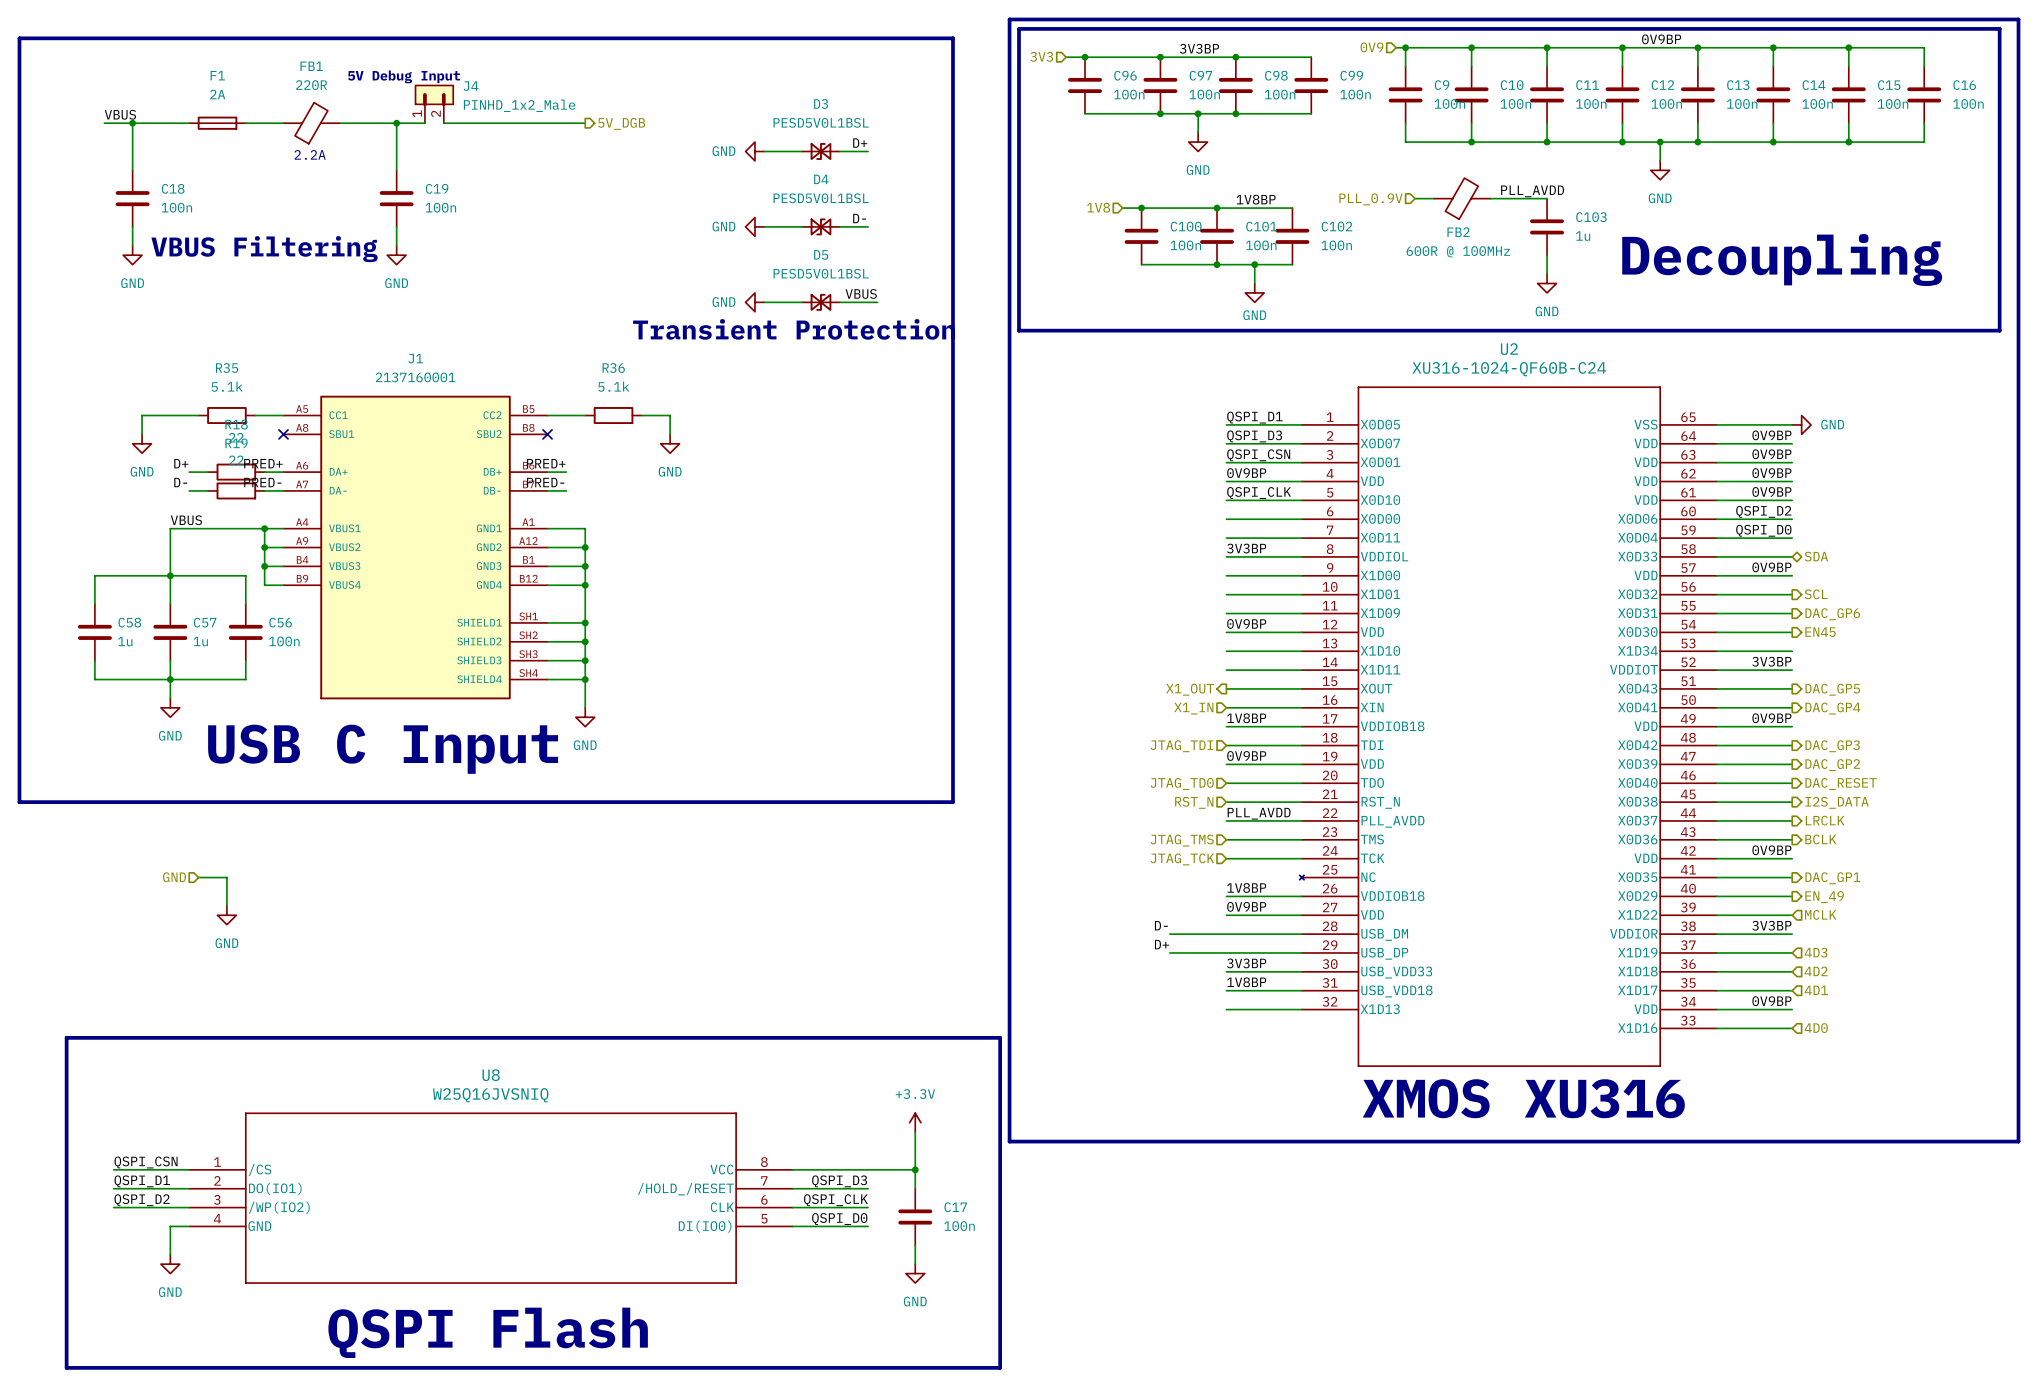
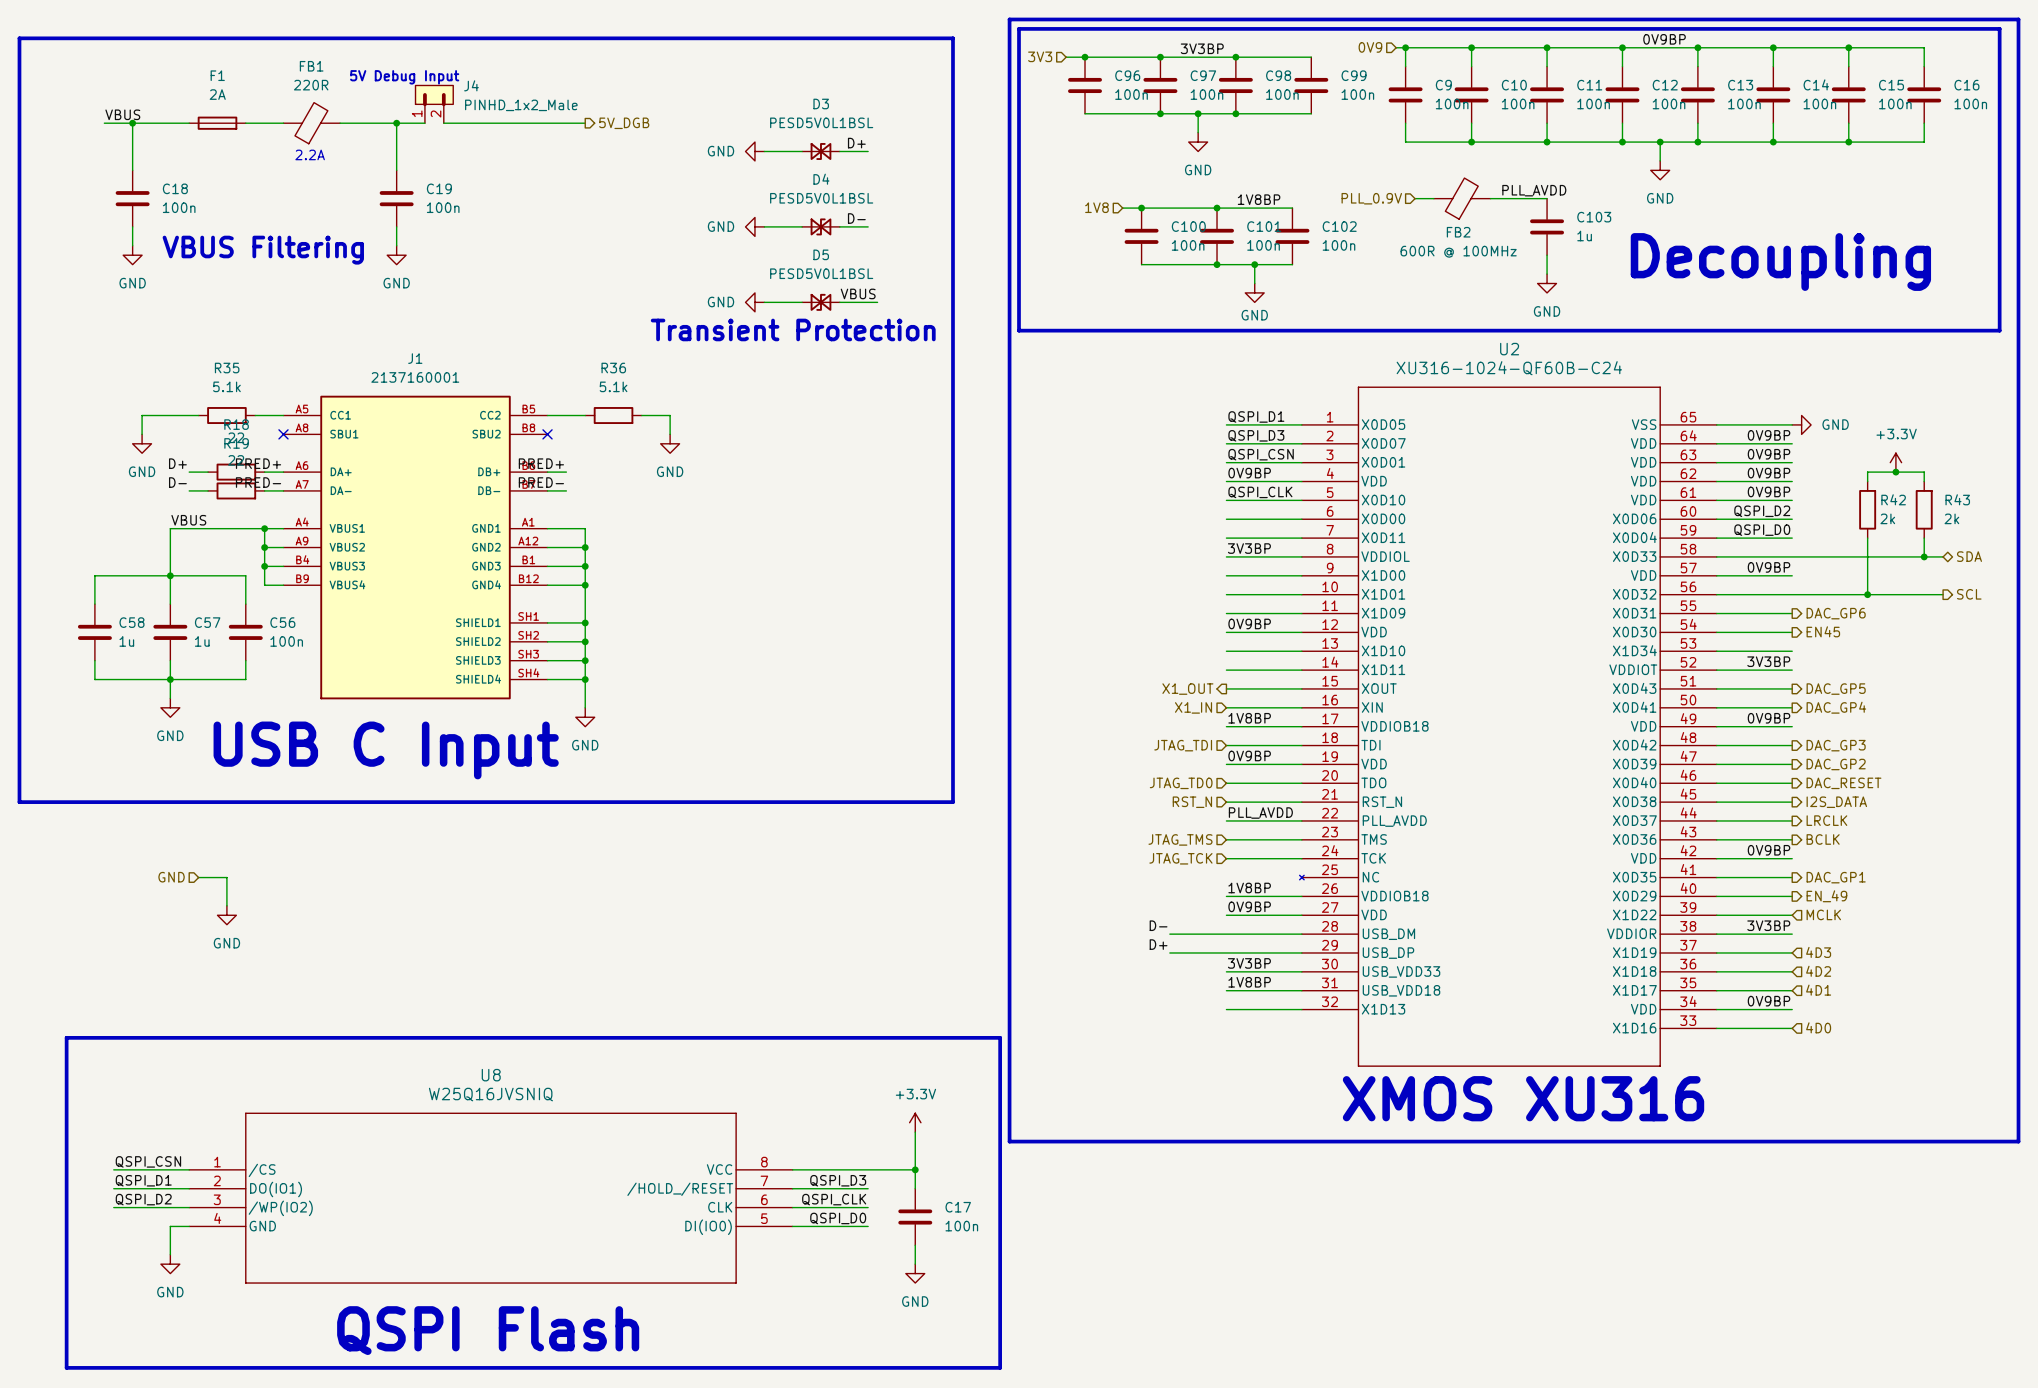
power symbol: none -> +3.3V (1895, 462)
junction: none -> (1895, 472)
wire: none -> (1867, 481) (1867, 472) (1924, 472) (1924, 481)
R42: none -> 2k (1867, 509)
R43: none -> 2k (1924, 509)
wire: none -> (1867, 538) (1867, 594)
wire: none -> (1924, 538) (1924, 556)
wire: none -> (1792, 556) (1943, 556)
hierarchical label position: SDA (1816, 556) -> SDA (1969, 556)
junction: none -> (1924, 556)
wire: none -> (1792, 594) (1943, 594)
hierarchical label position: SCL (1816, 594) -> SCL (1969, 594)
junction: none -> (1867, 594)

